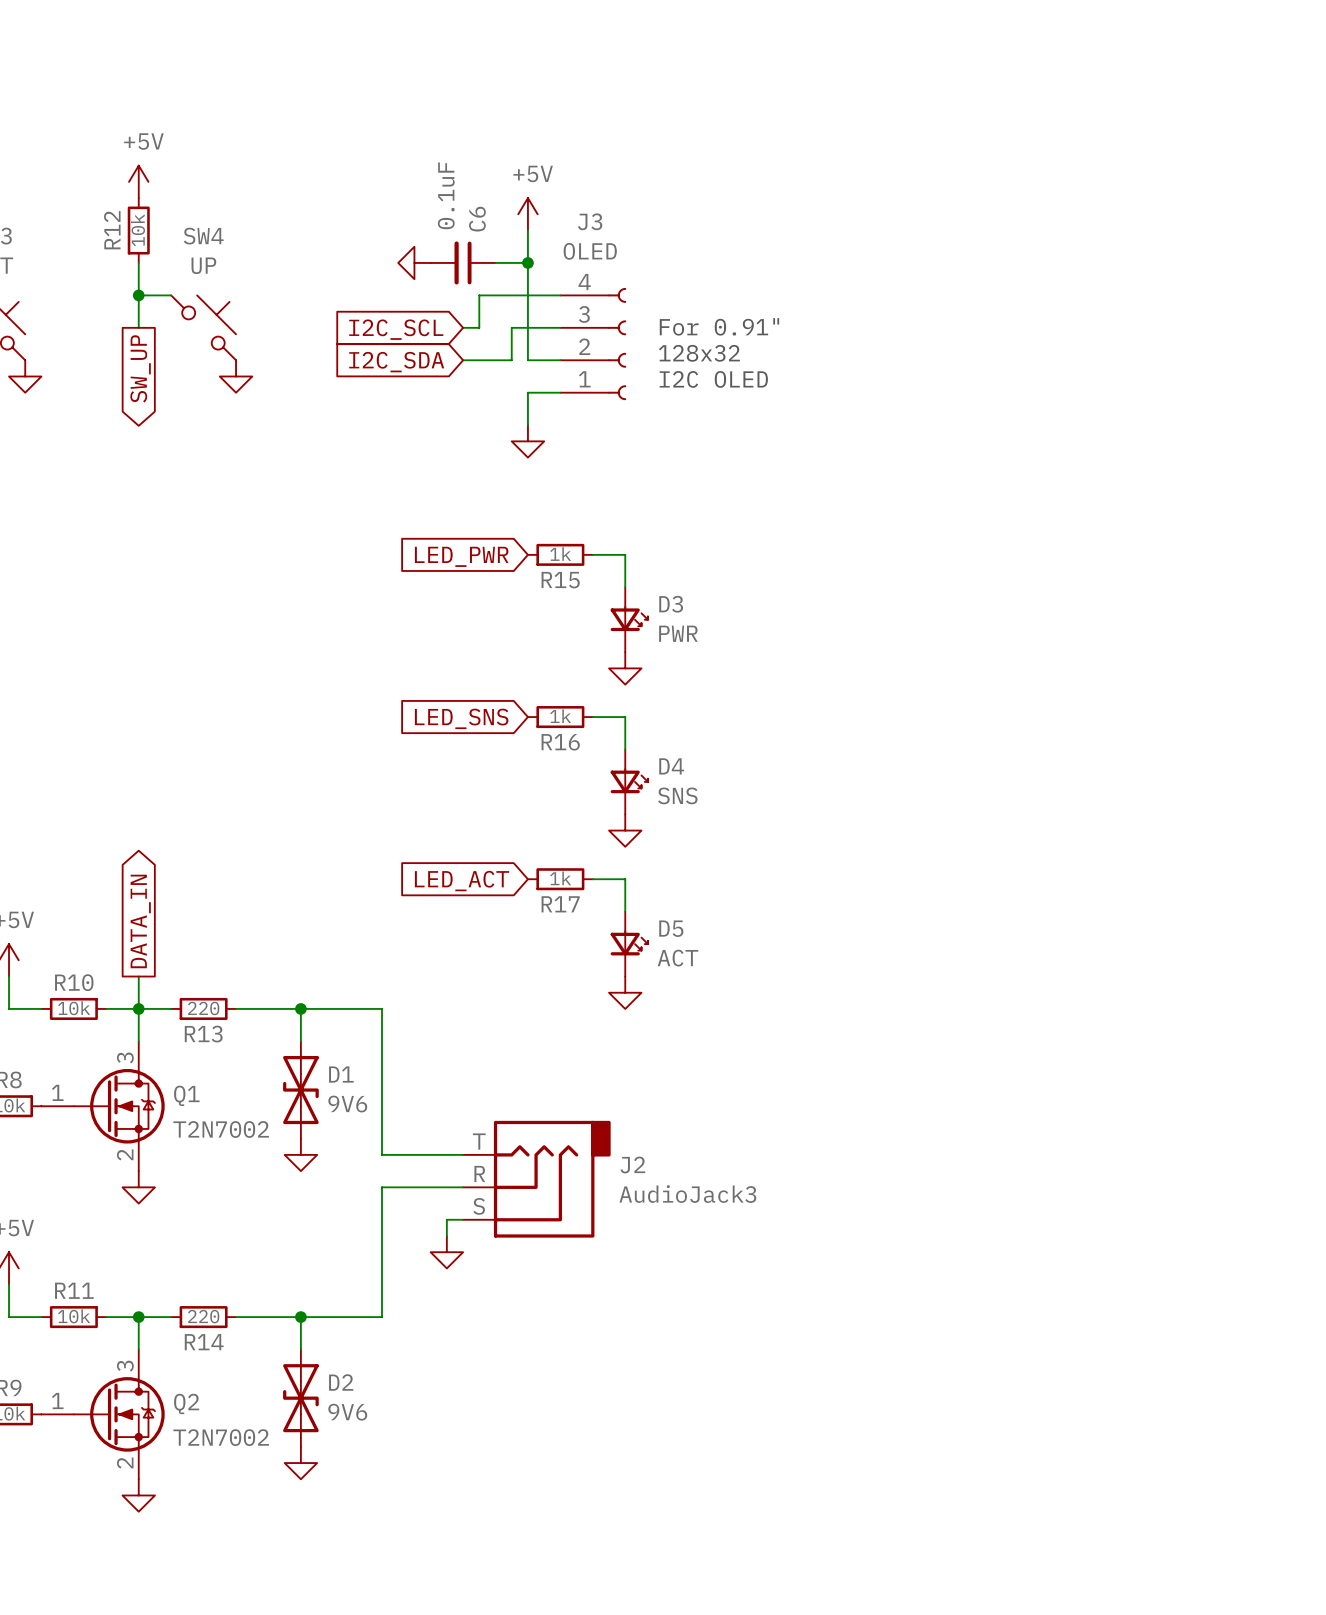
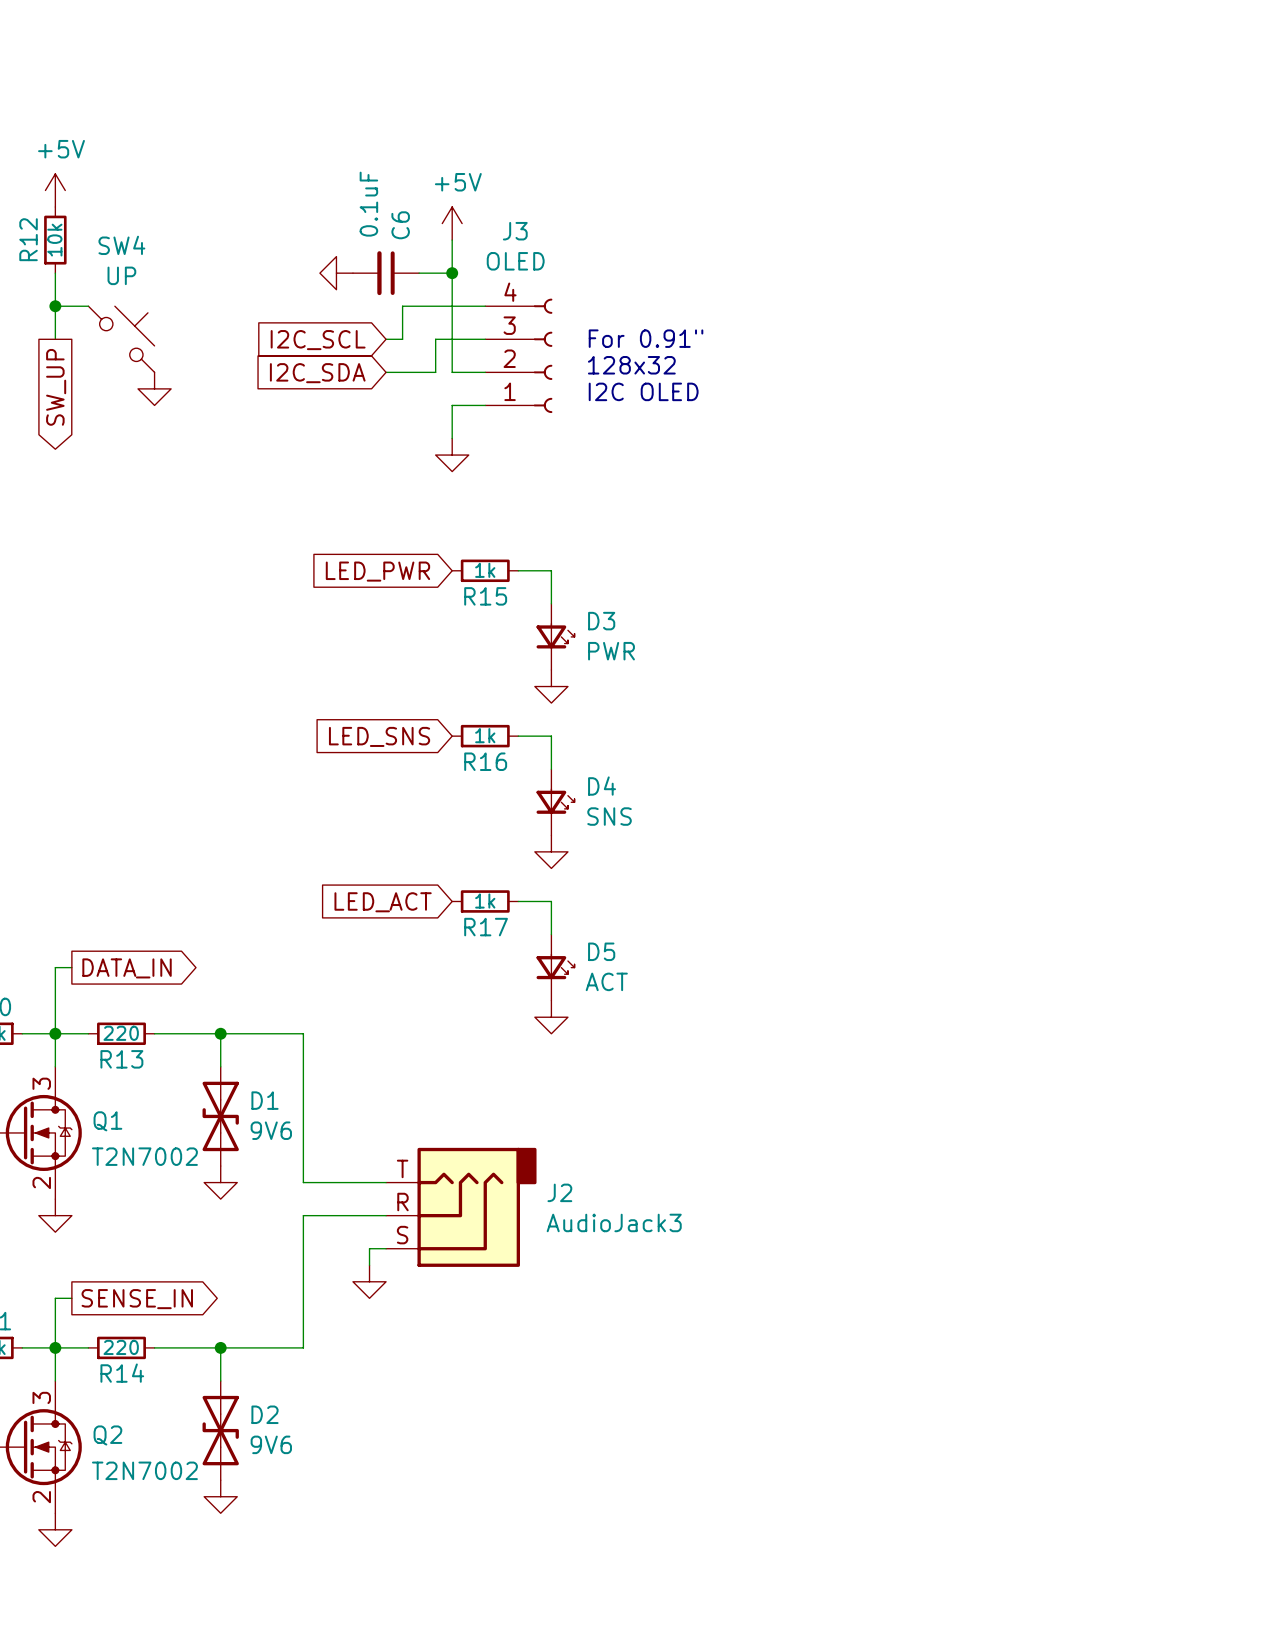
global label rotation: 0° (140, 921) -> 90° clockwise (127, 968)
wire: none -> (71, 967) (55, 967) (55, 1000)
wire: none -> (71, 1298) (55, 1298) (55, 1347)
global label: none -> SENSE_IN (137, 1299)

